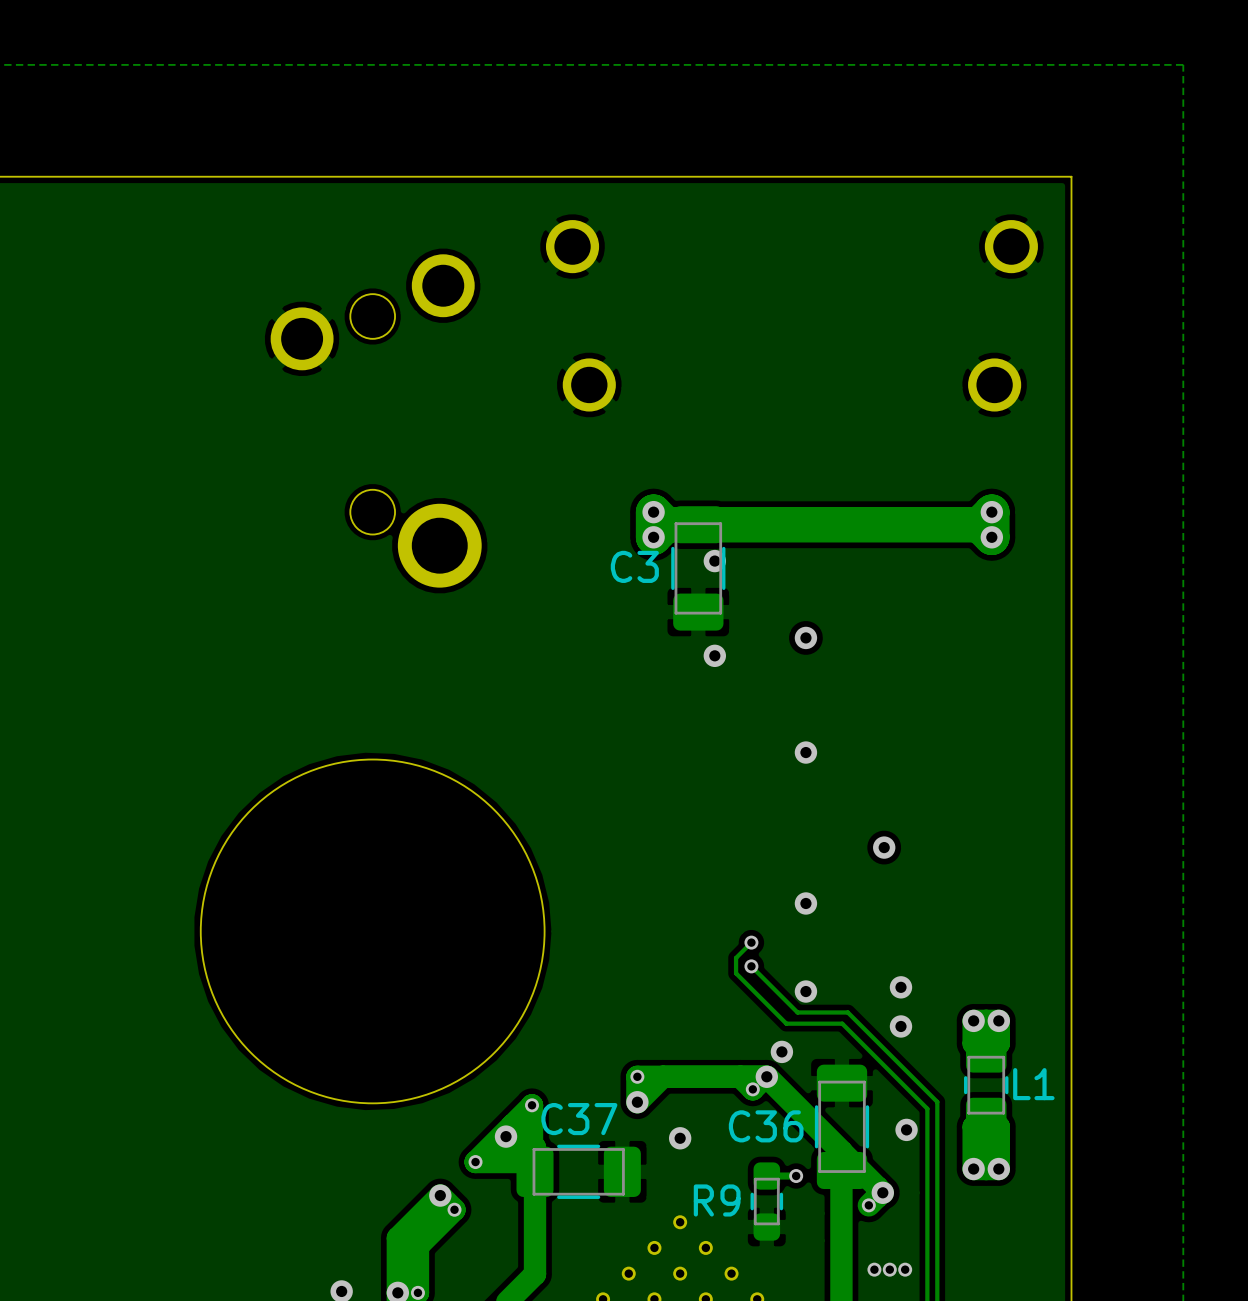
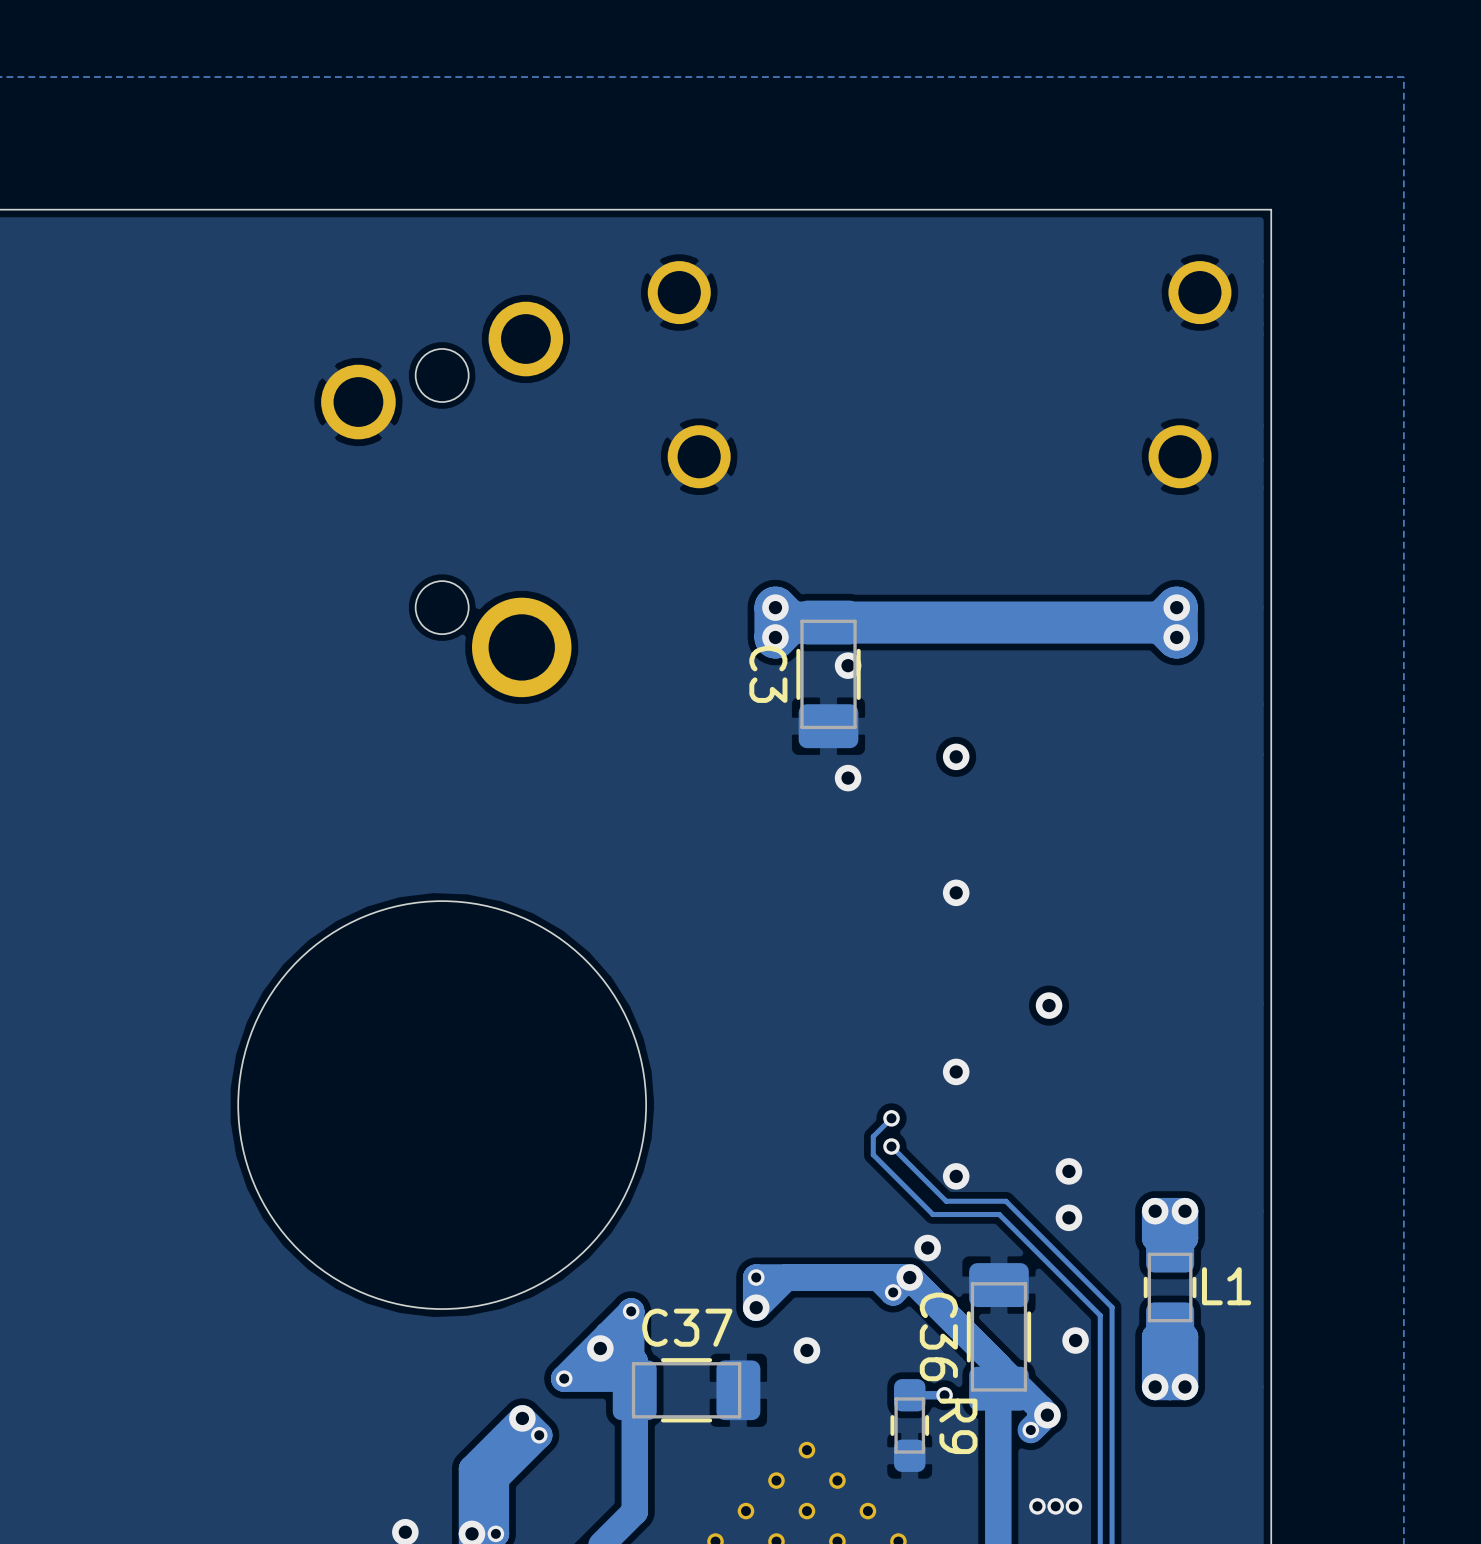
C3 name rotation: 0° (634, 566) -> 90° clockwise (768, 674)
C36 name rotation: 0° (766, 1126) -> 90° clockwise (938, 1336)
R9 name rotation: 0° (717, 1200) -> 90° clockwise (958, 1426)
R9 name position: R9 (717, 1200) -> R9 (958, 1426)

